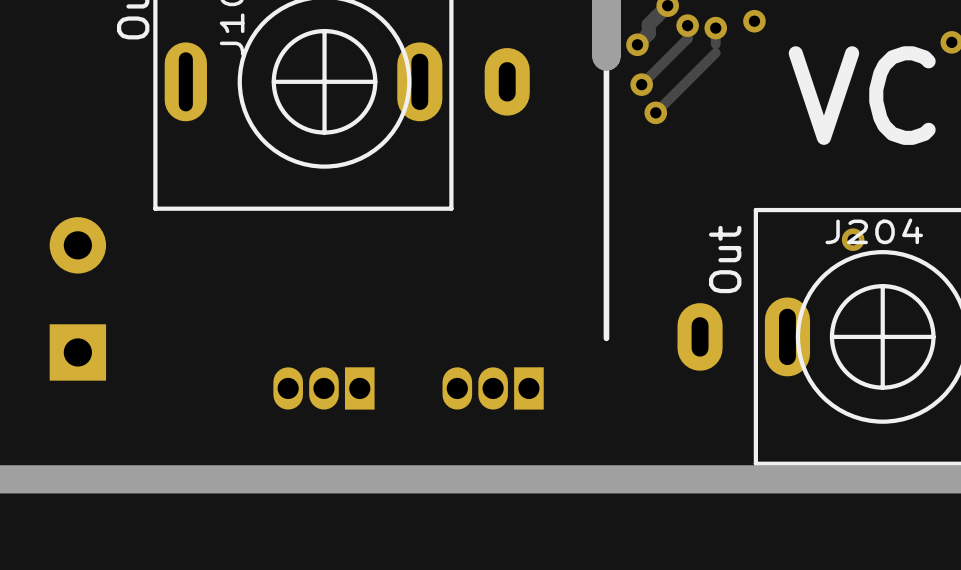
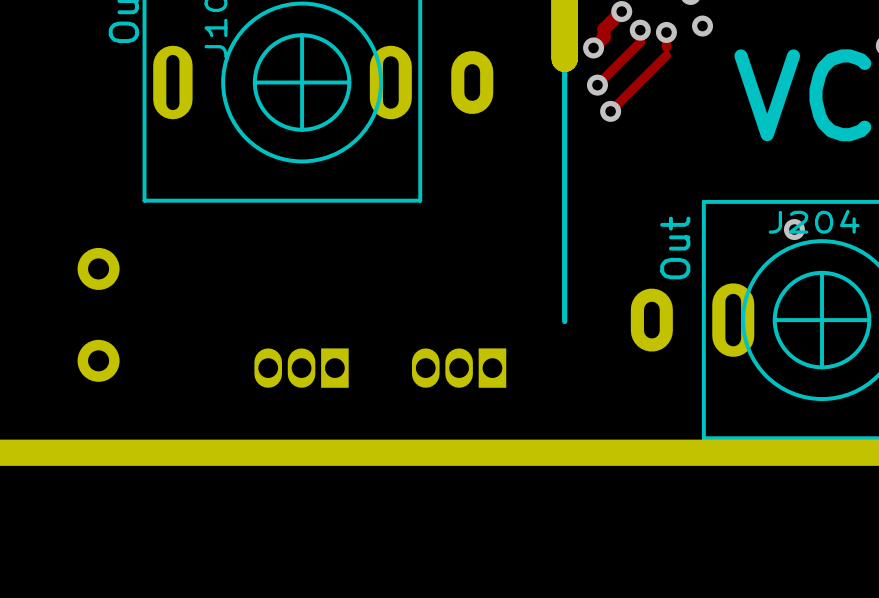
part: (77, 298) -> none
part: none -> (98, 314)

